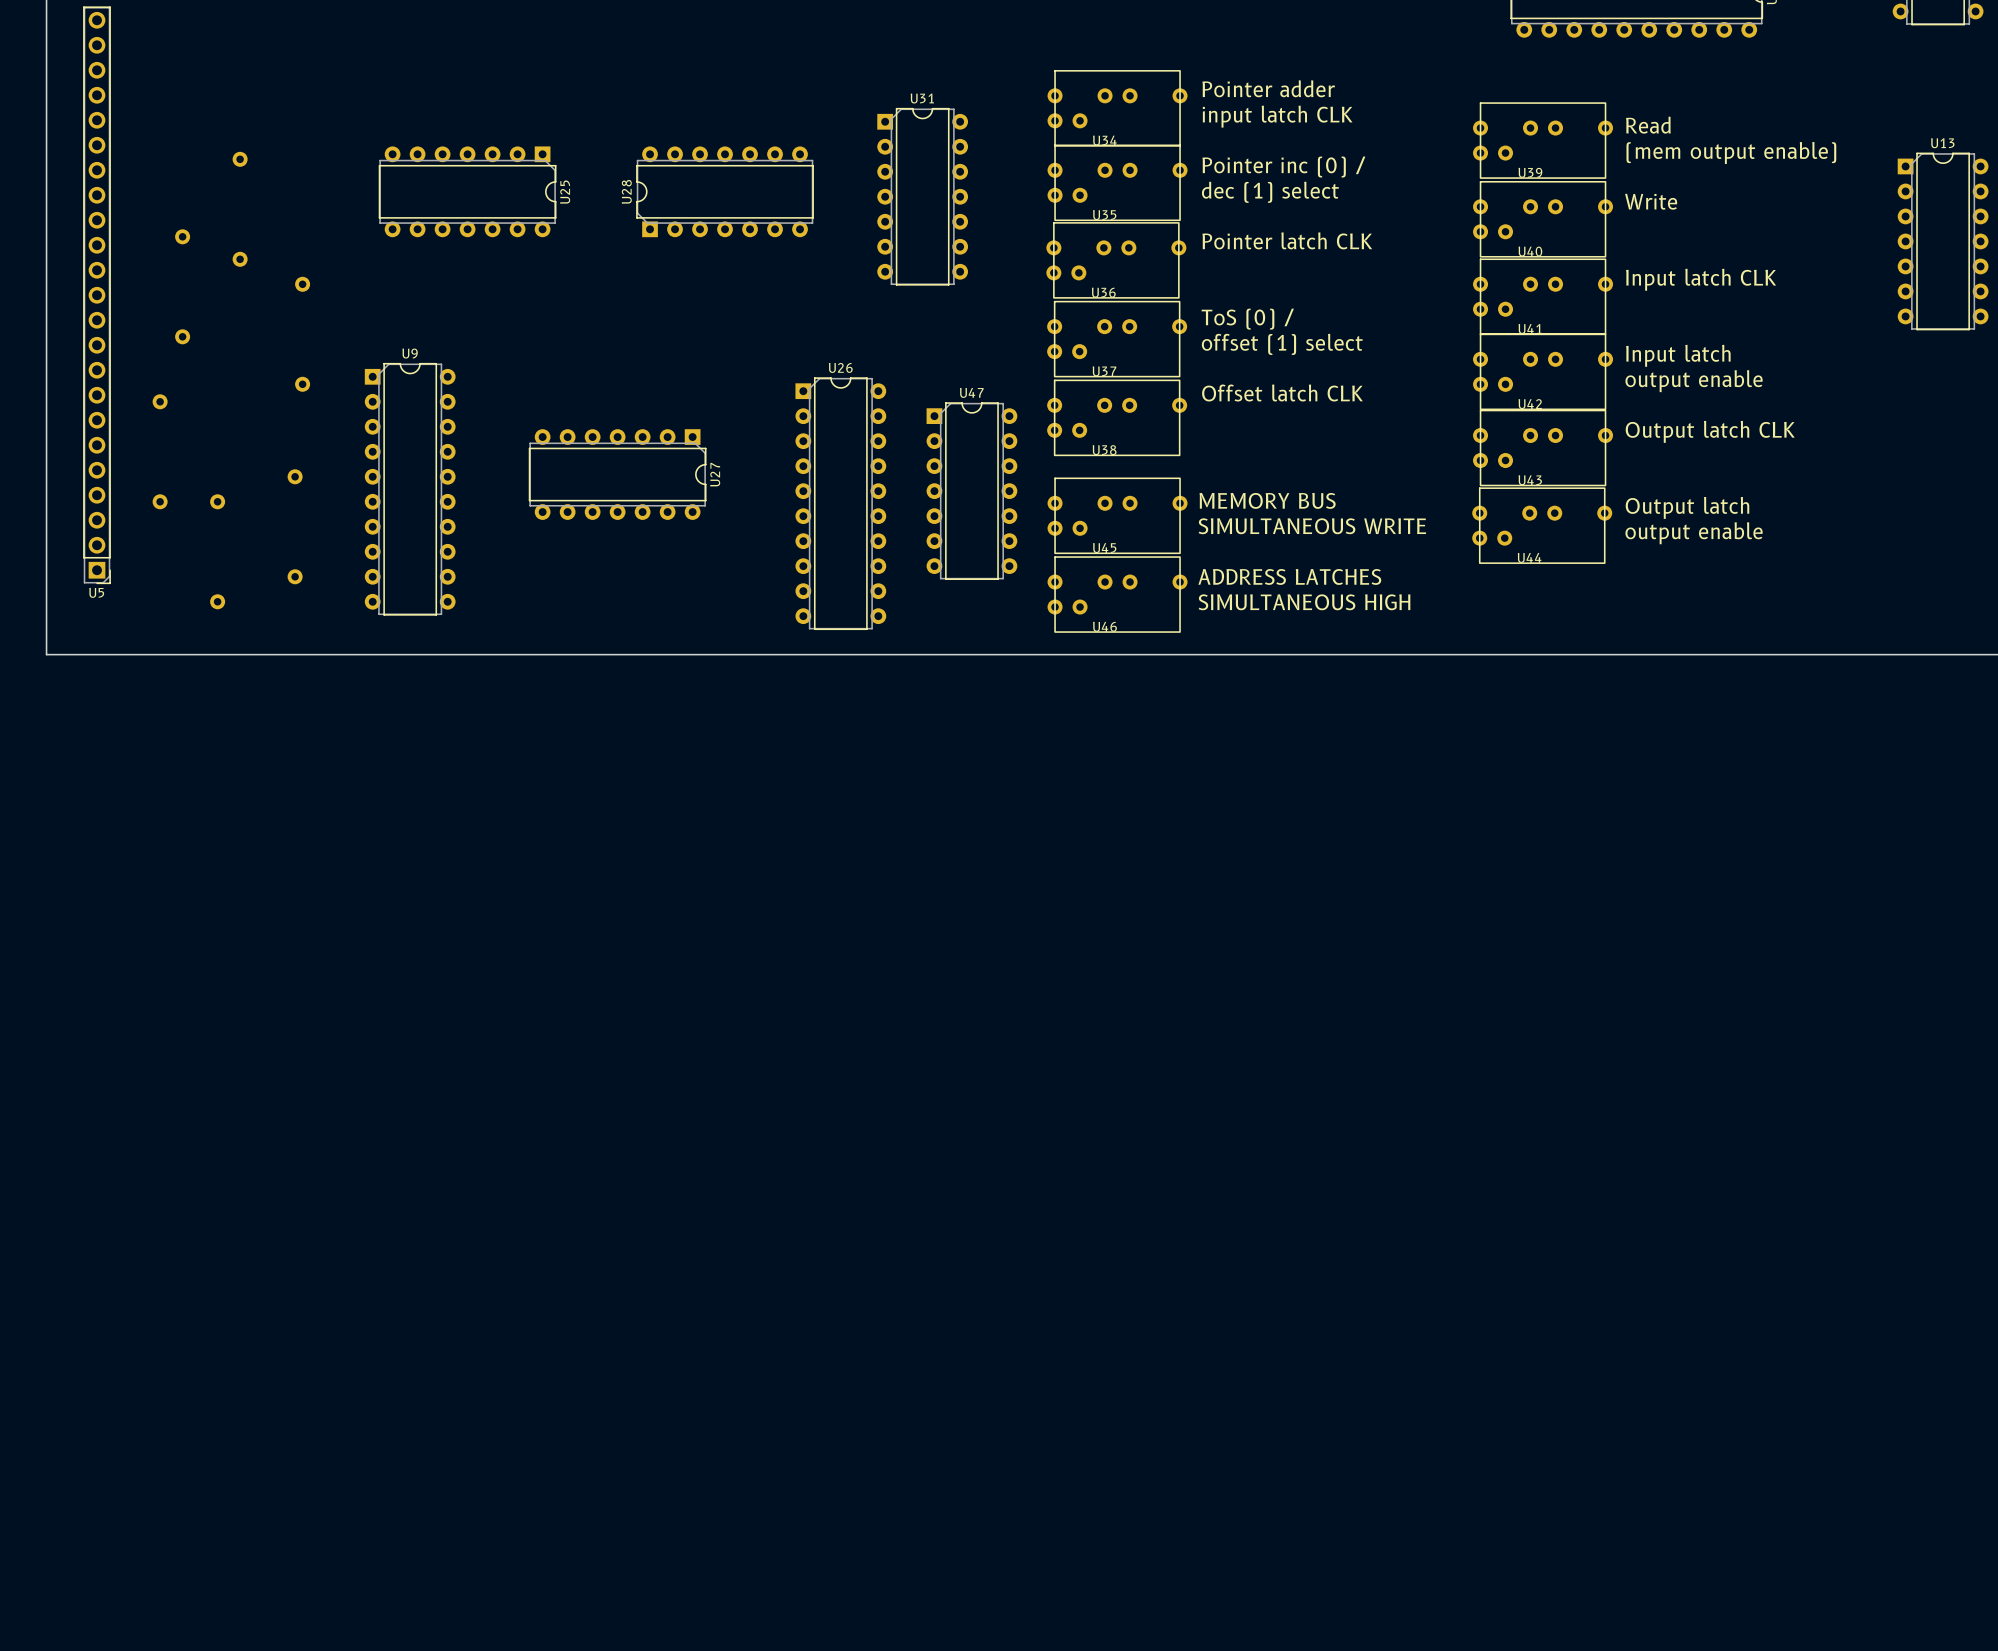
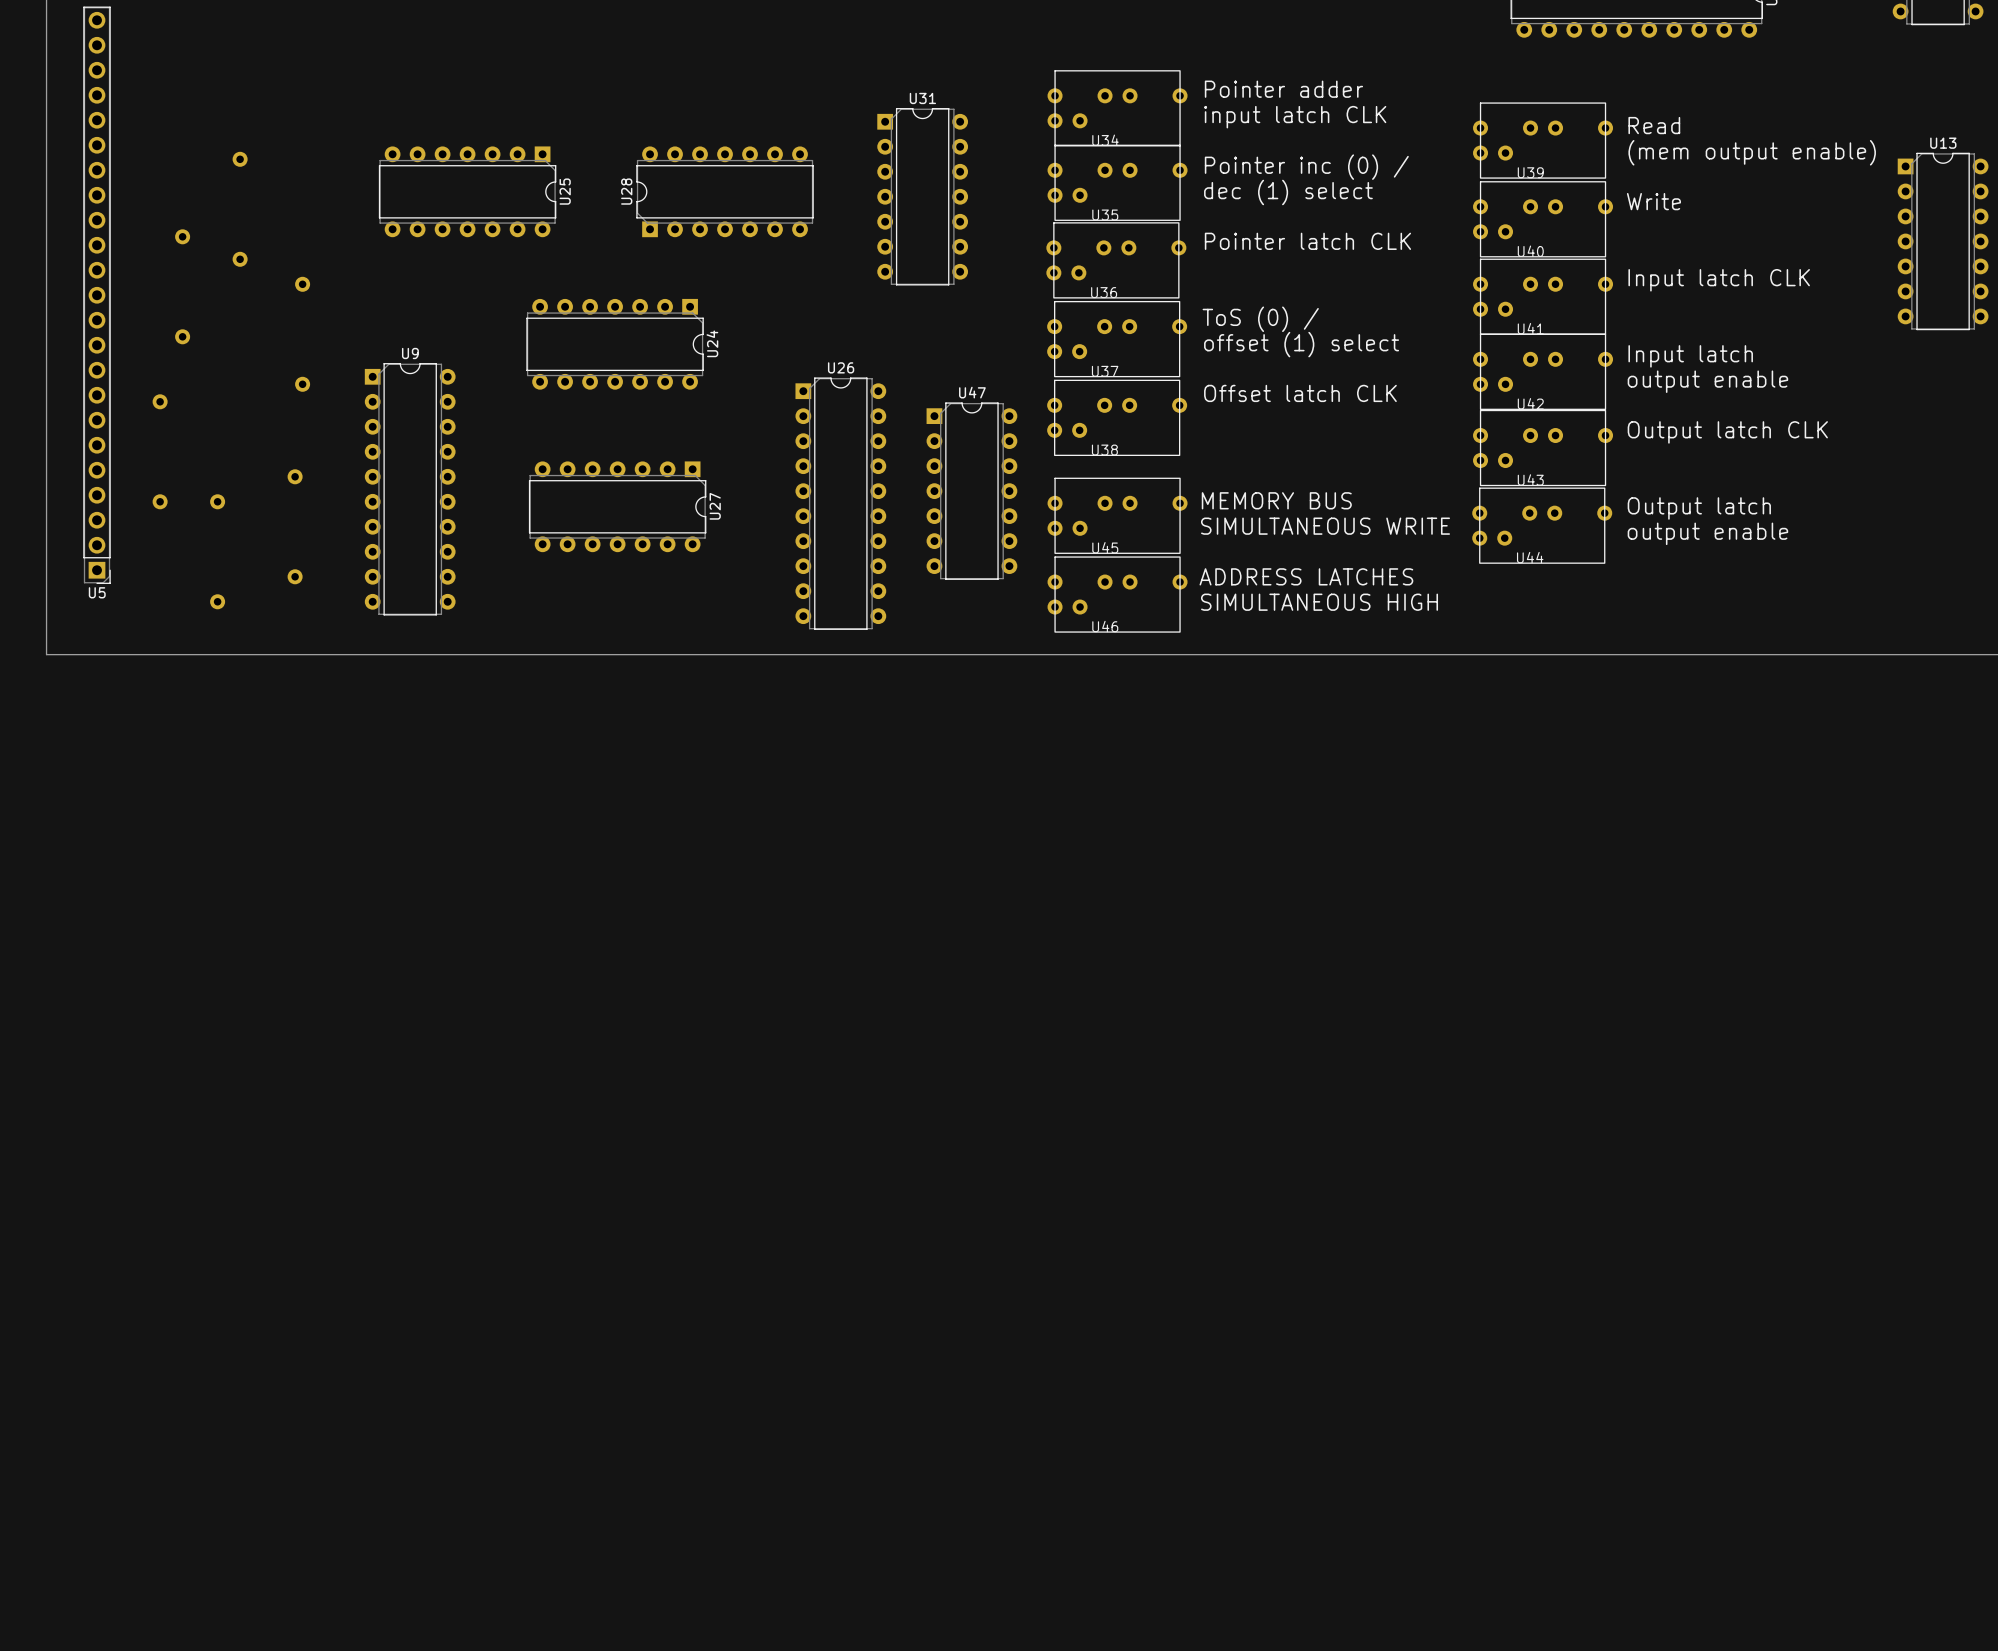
U24: none -> (615, 344)
U27 position: (617, 474) -> (617, 506)

